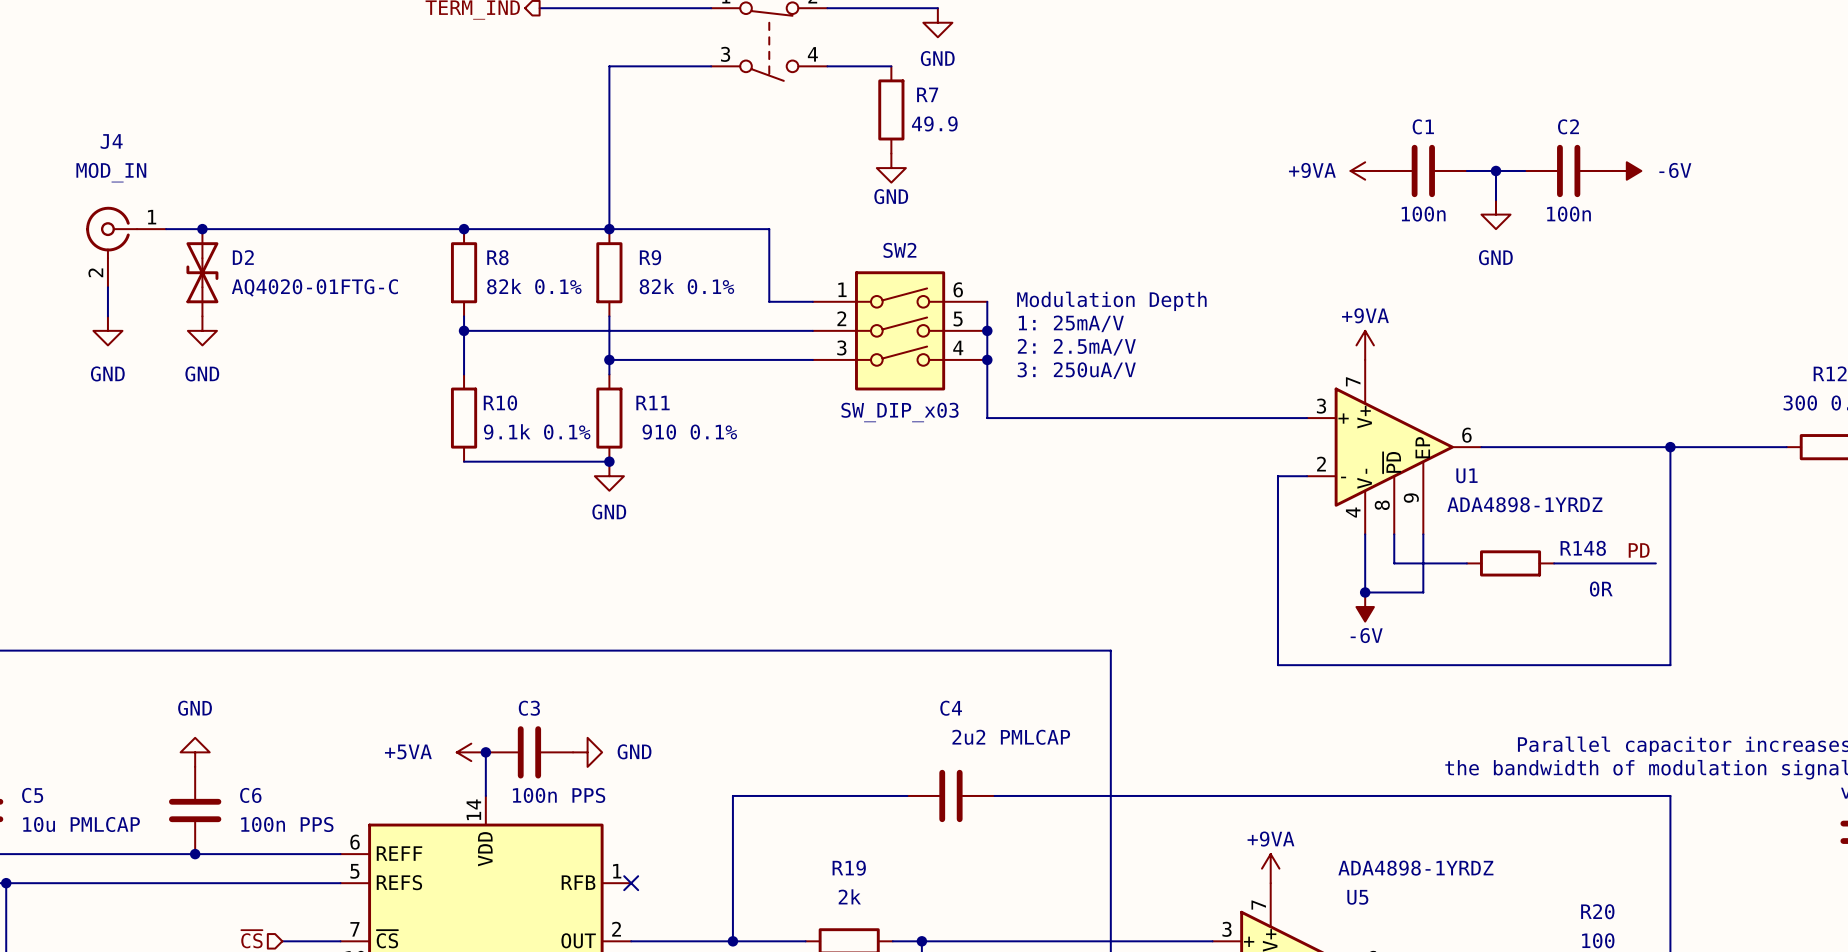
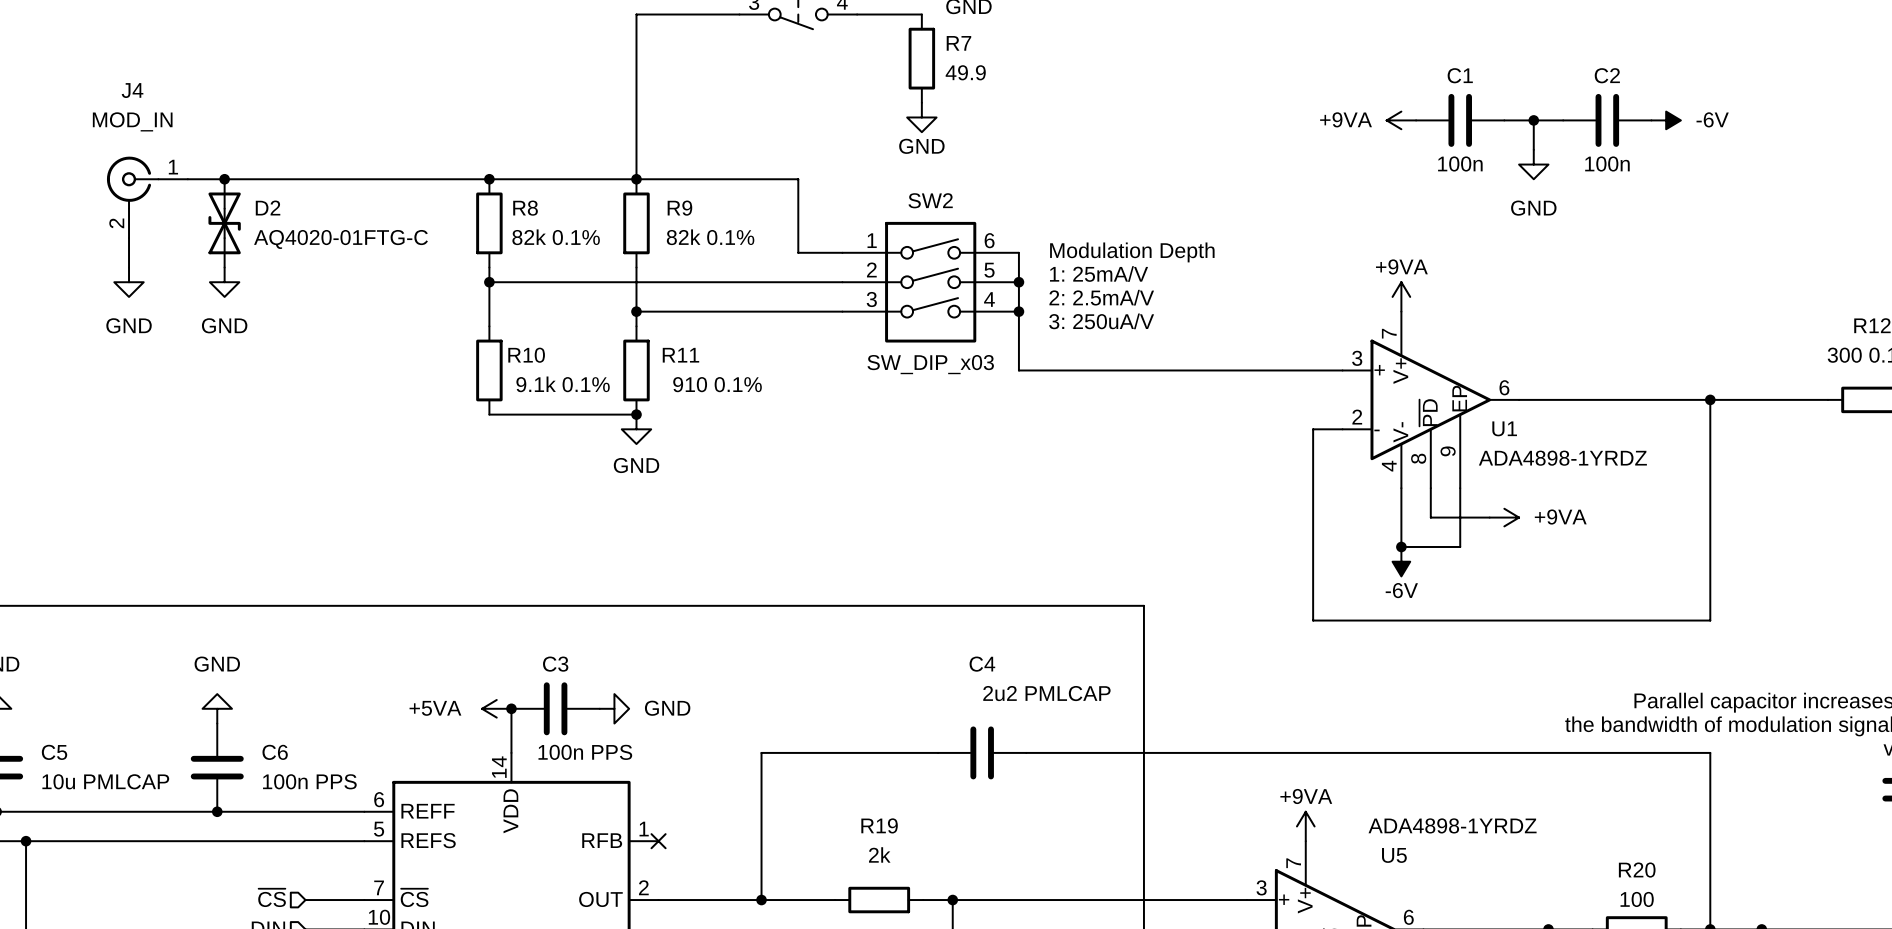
label: PD (1639, 550) -> none
power symbol: none -> +9VA (1504, 517)
R148: 0R (1510, 563) -> none
wire: (1554, 563) (1655, 563) -> none

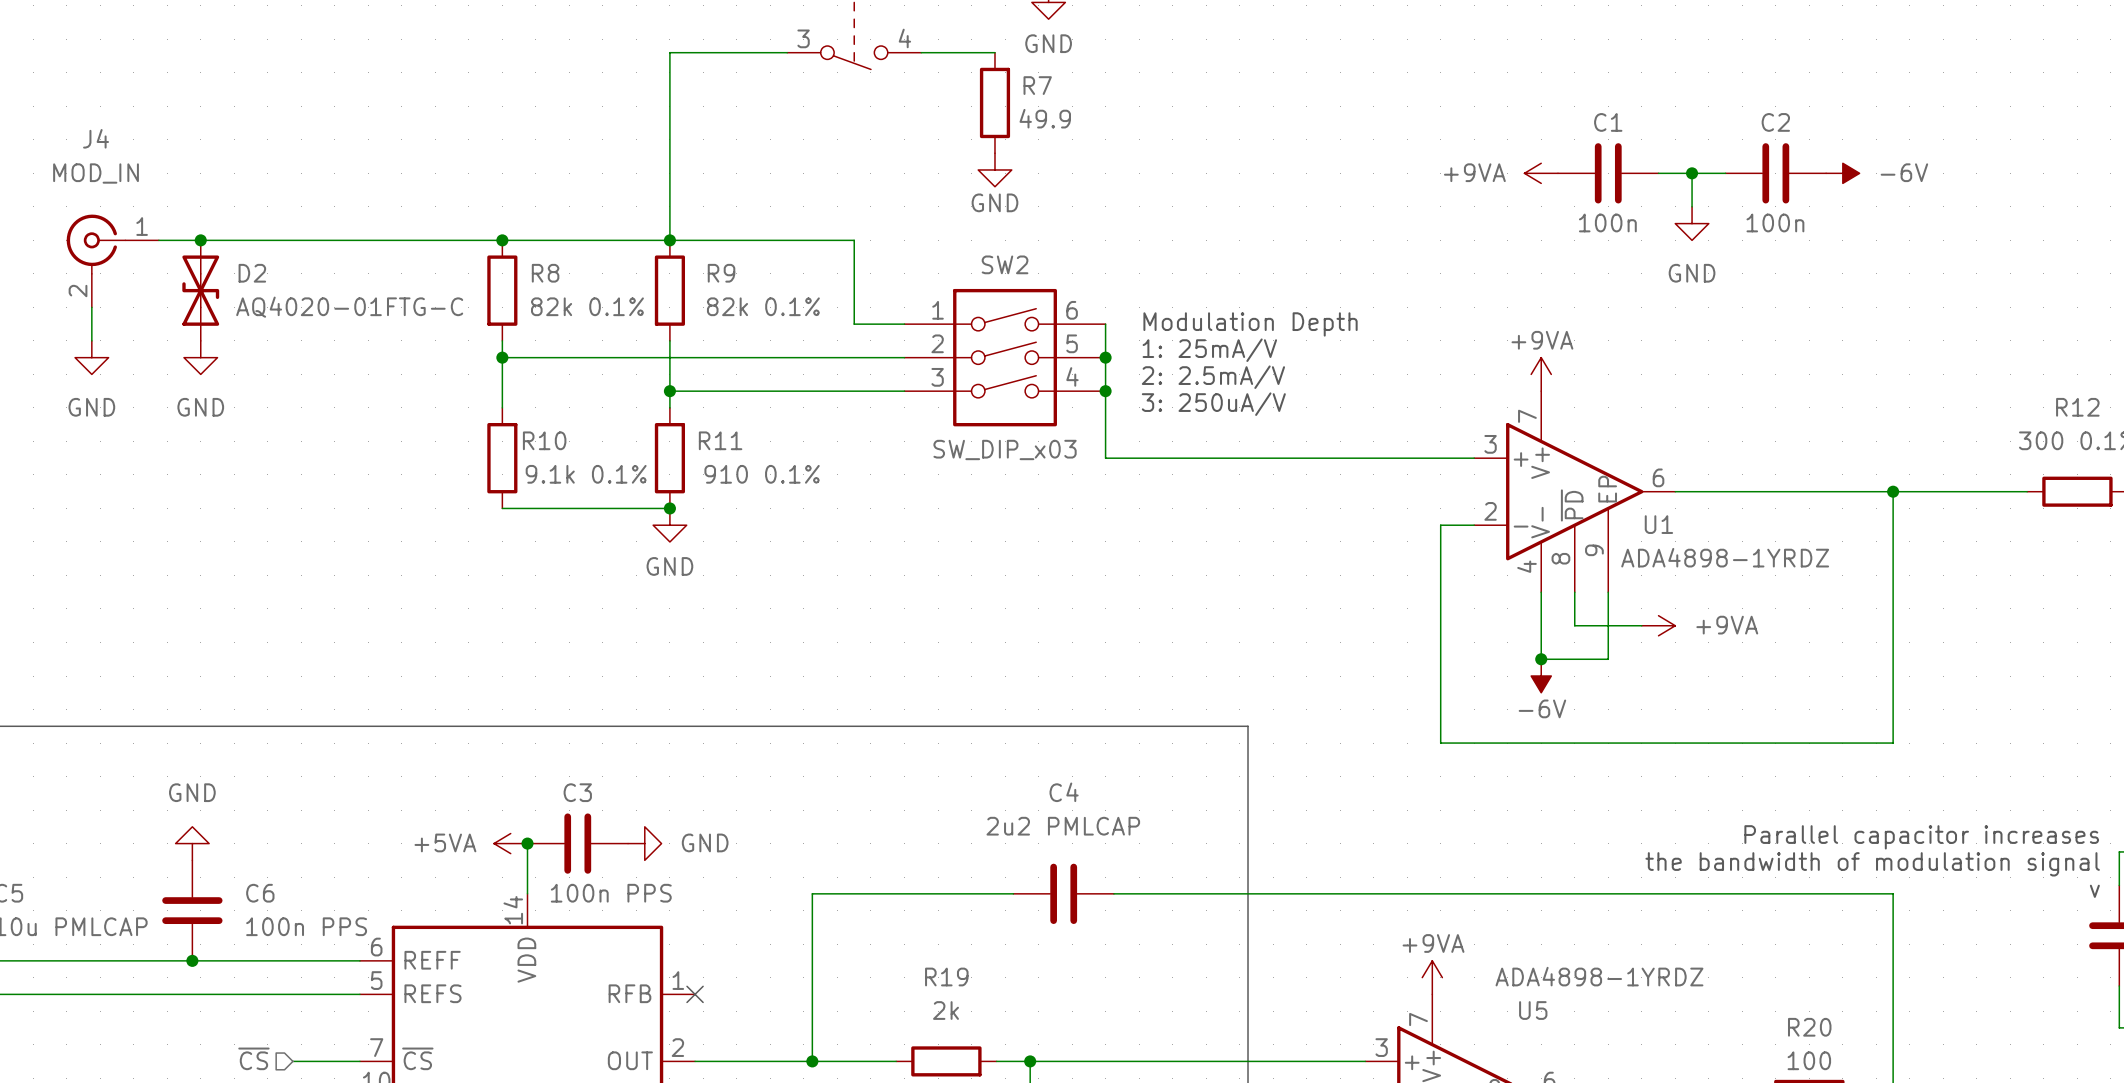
C4 value position: 2u2 PMLCAP (1046, 693) -> 2u2 PMLCAP (1063, 826)

